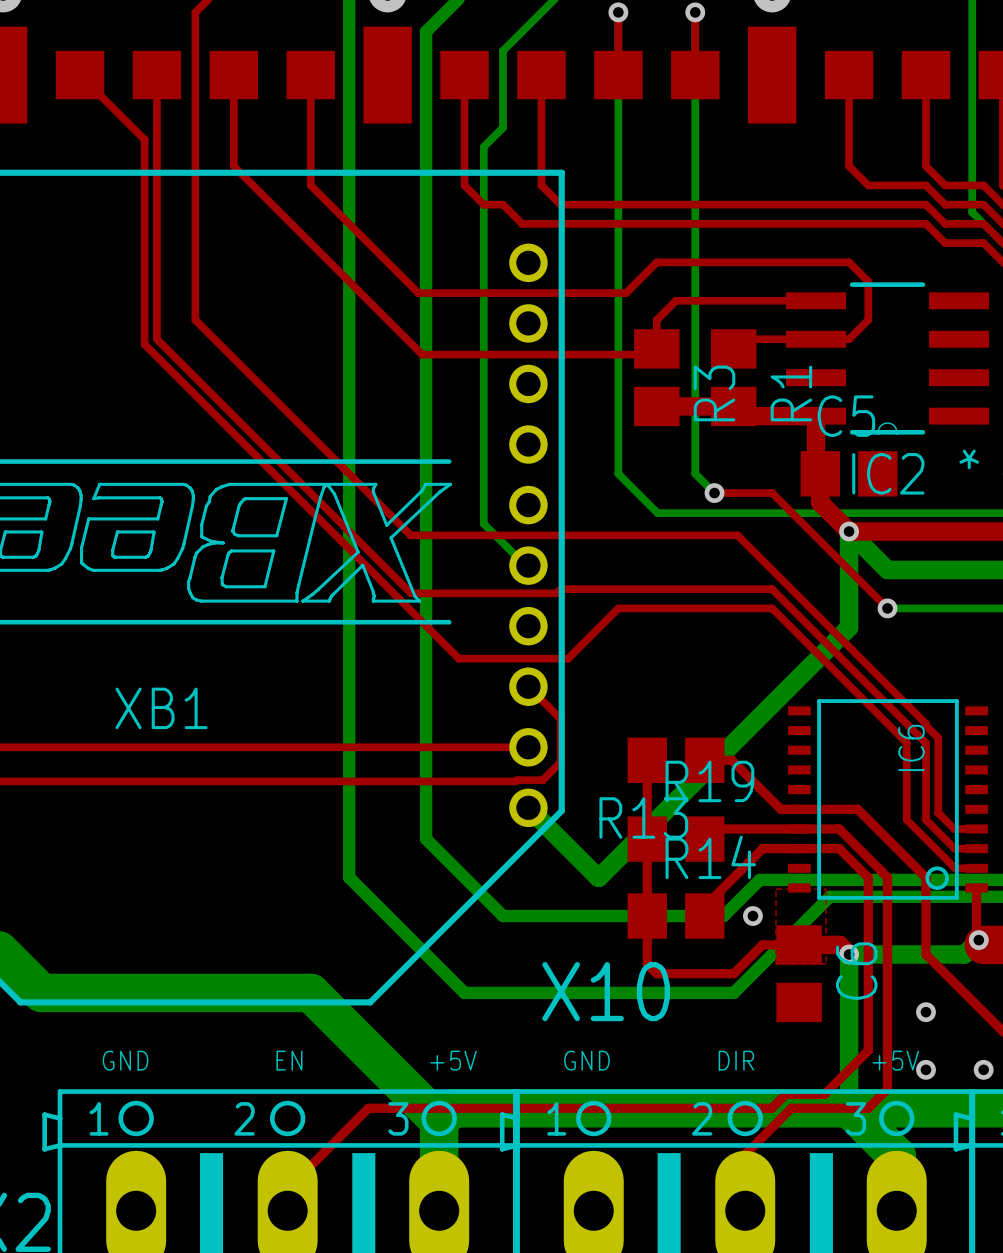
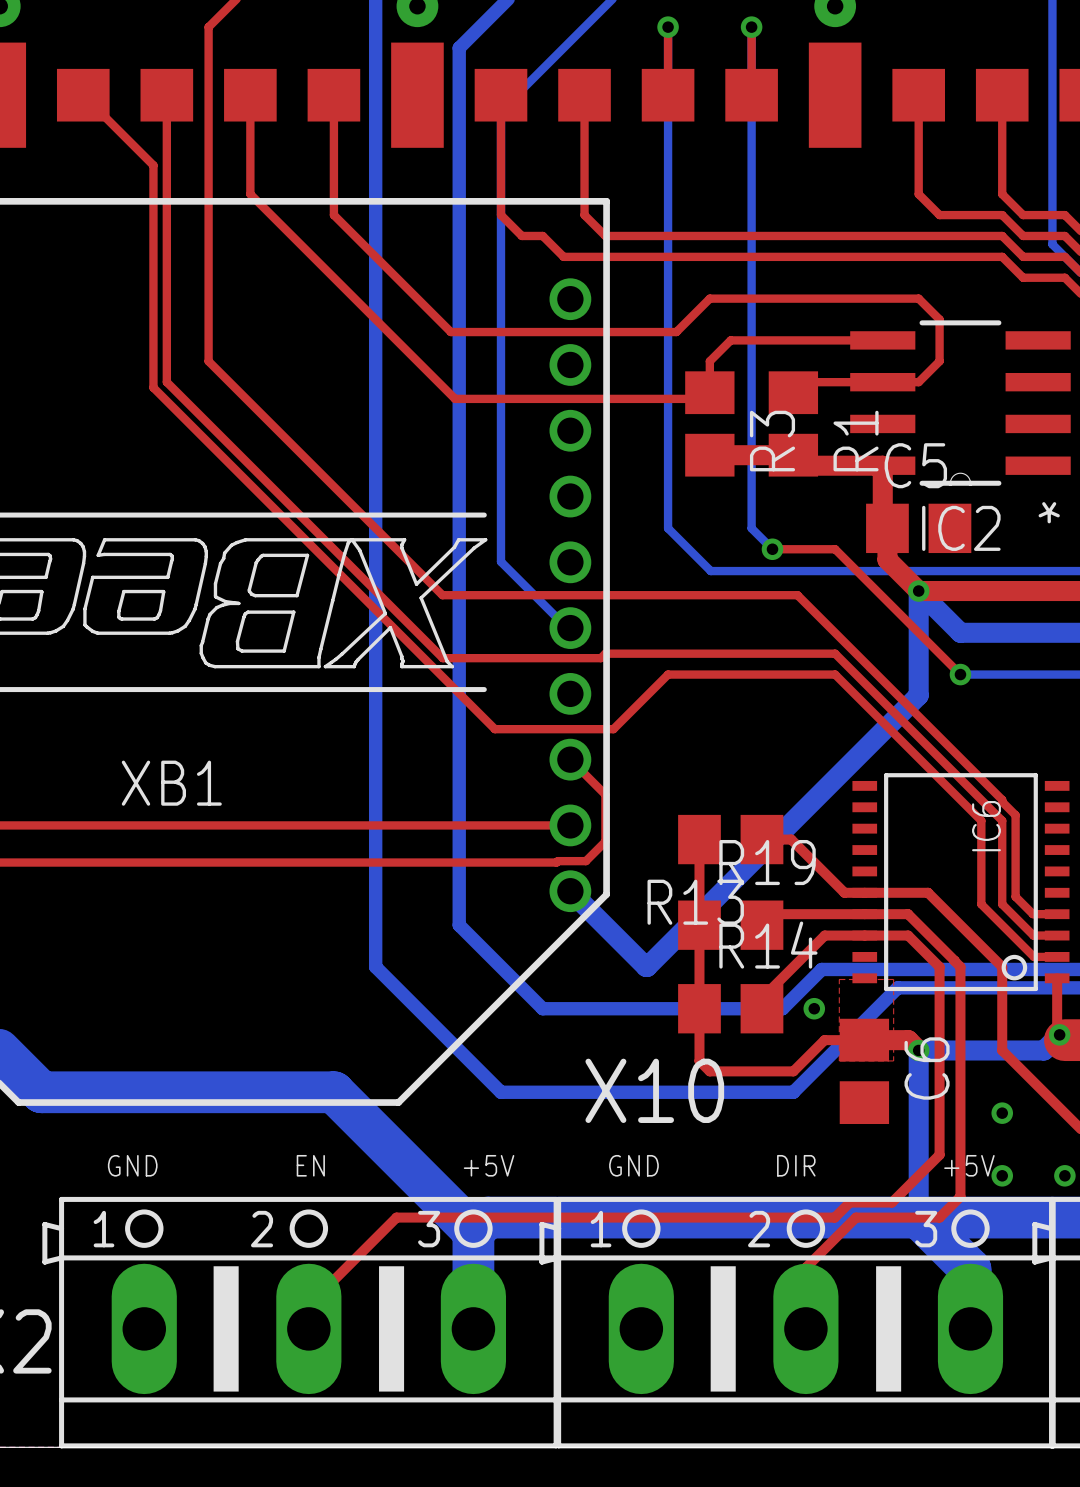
bottom track: (503, 50) (503, 127) (483, 146) (483, 523) -> (542, 68) (500, 110) (500, 561) (521, 582)

